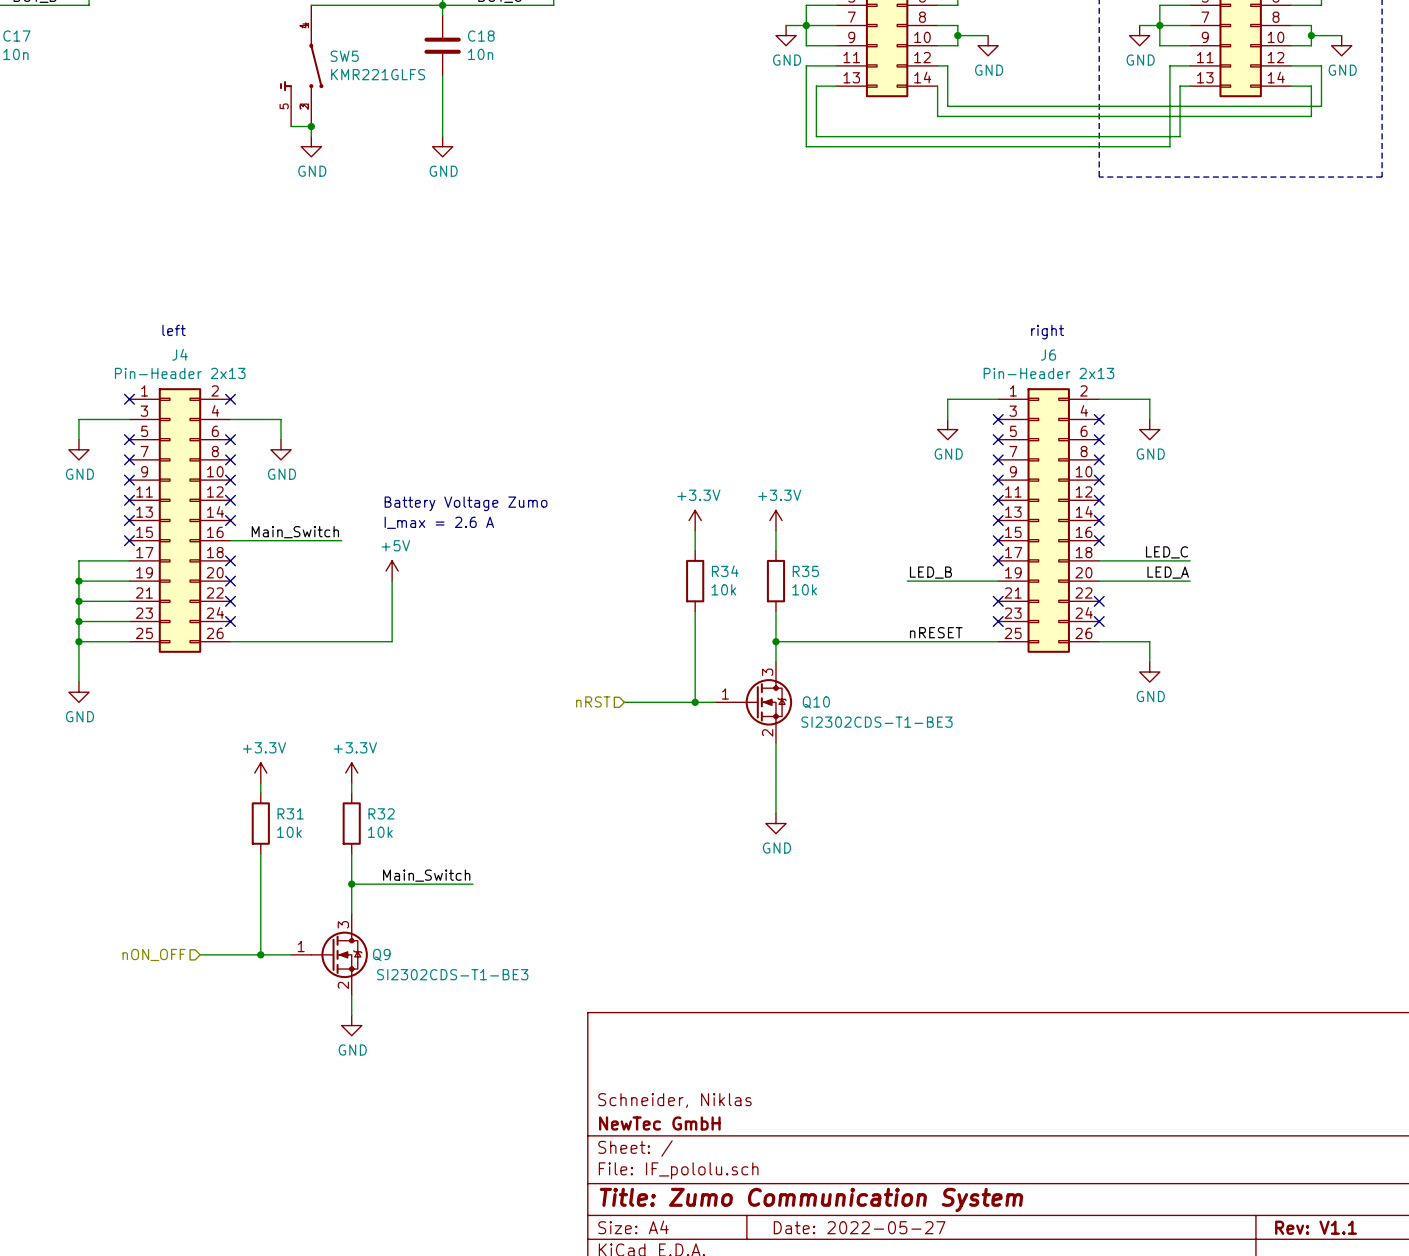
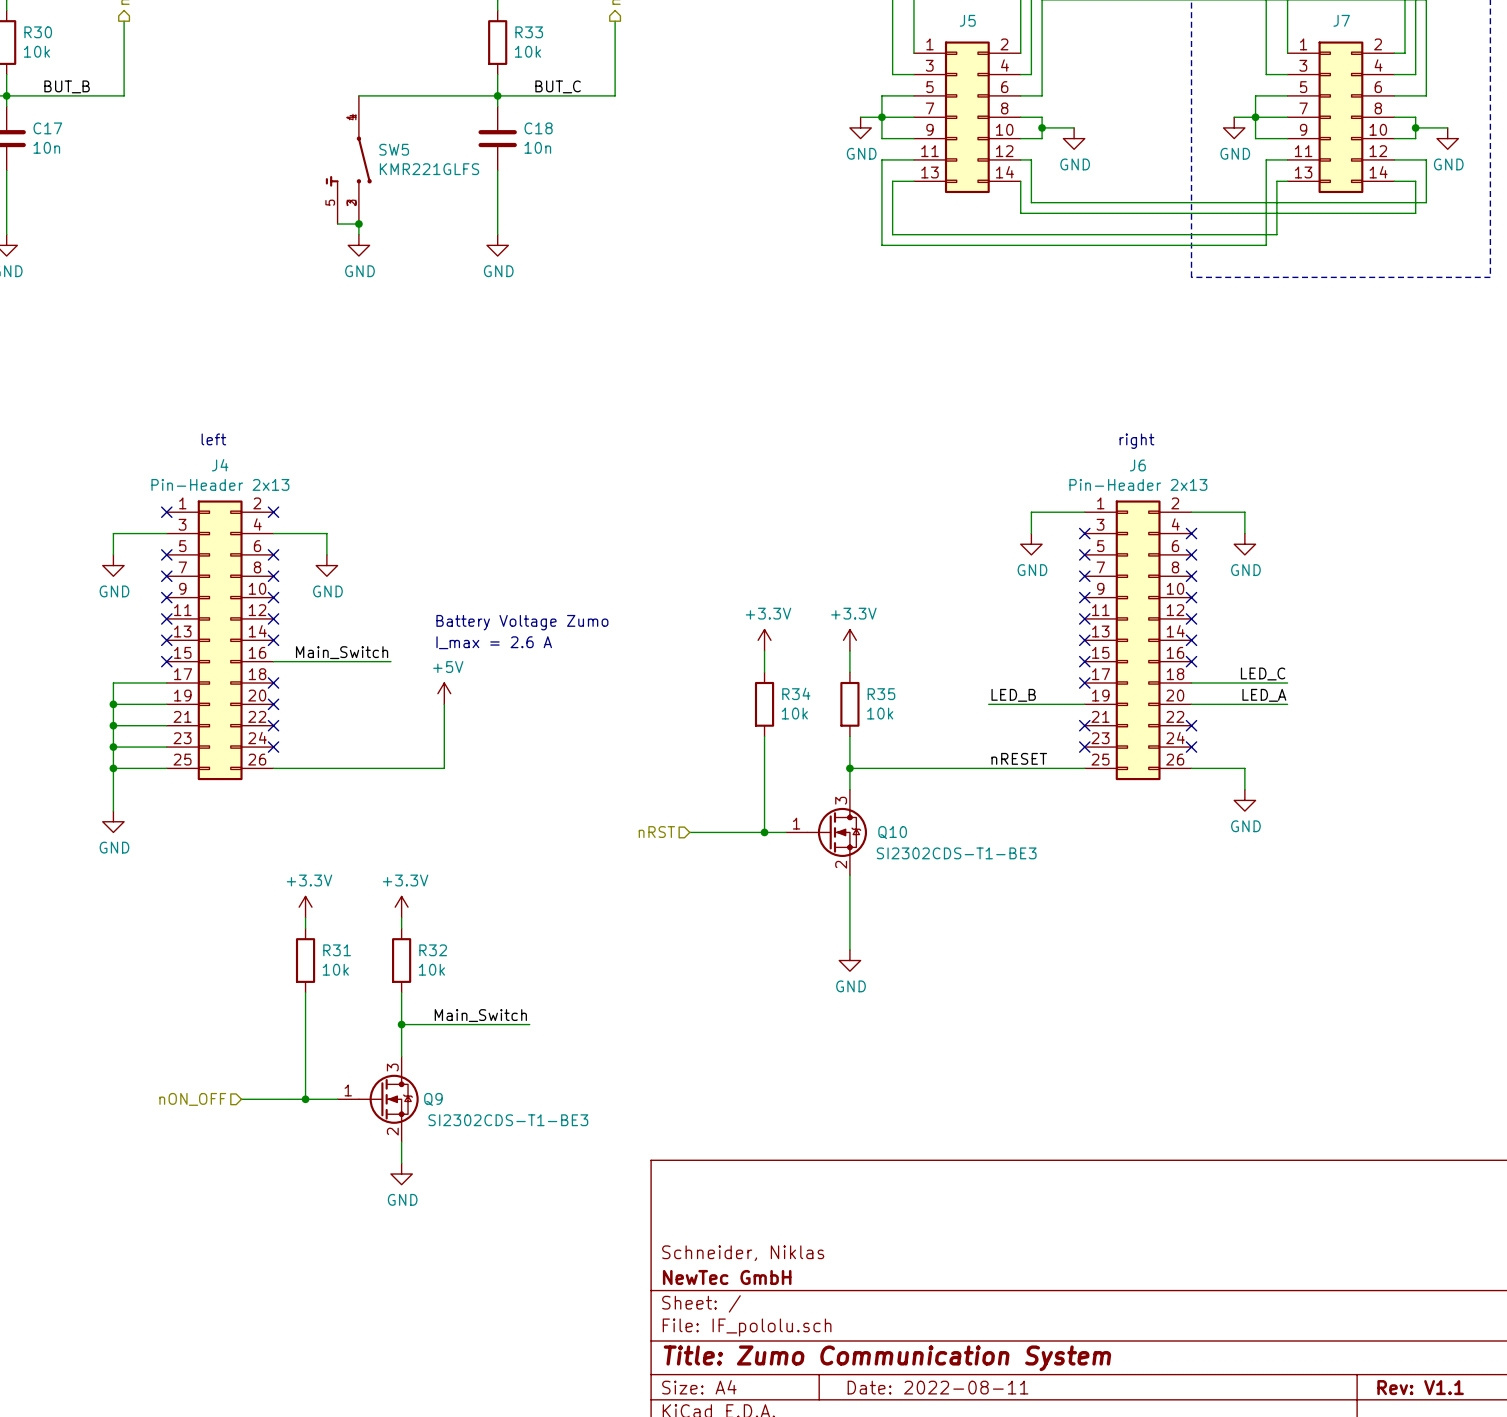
title block: Date: 2022-05-27 (859, 1227) -> Date: 2022-08-11 (938, 1387)

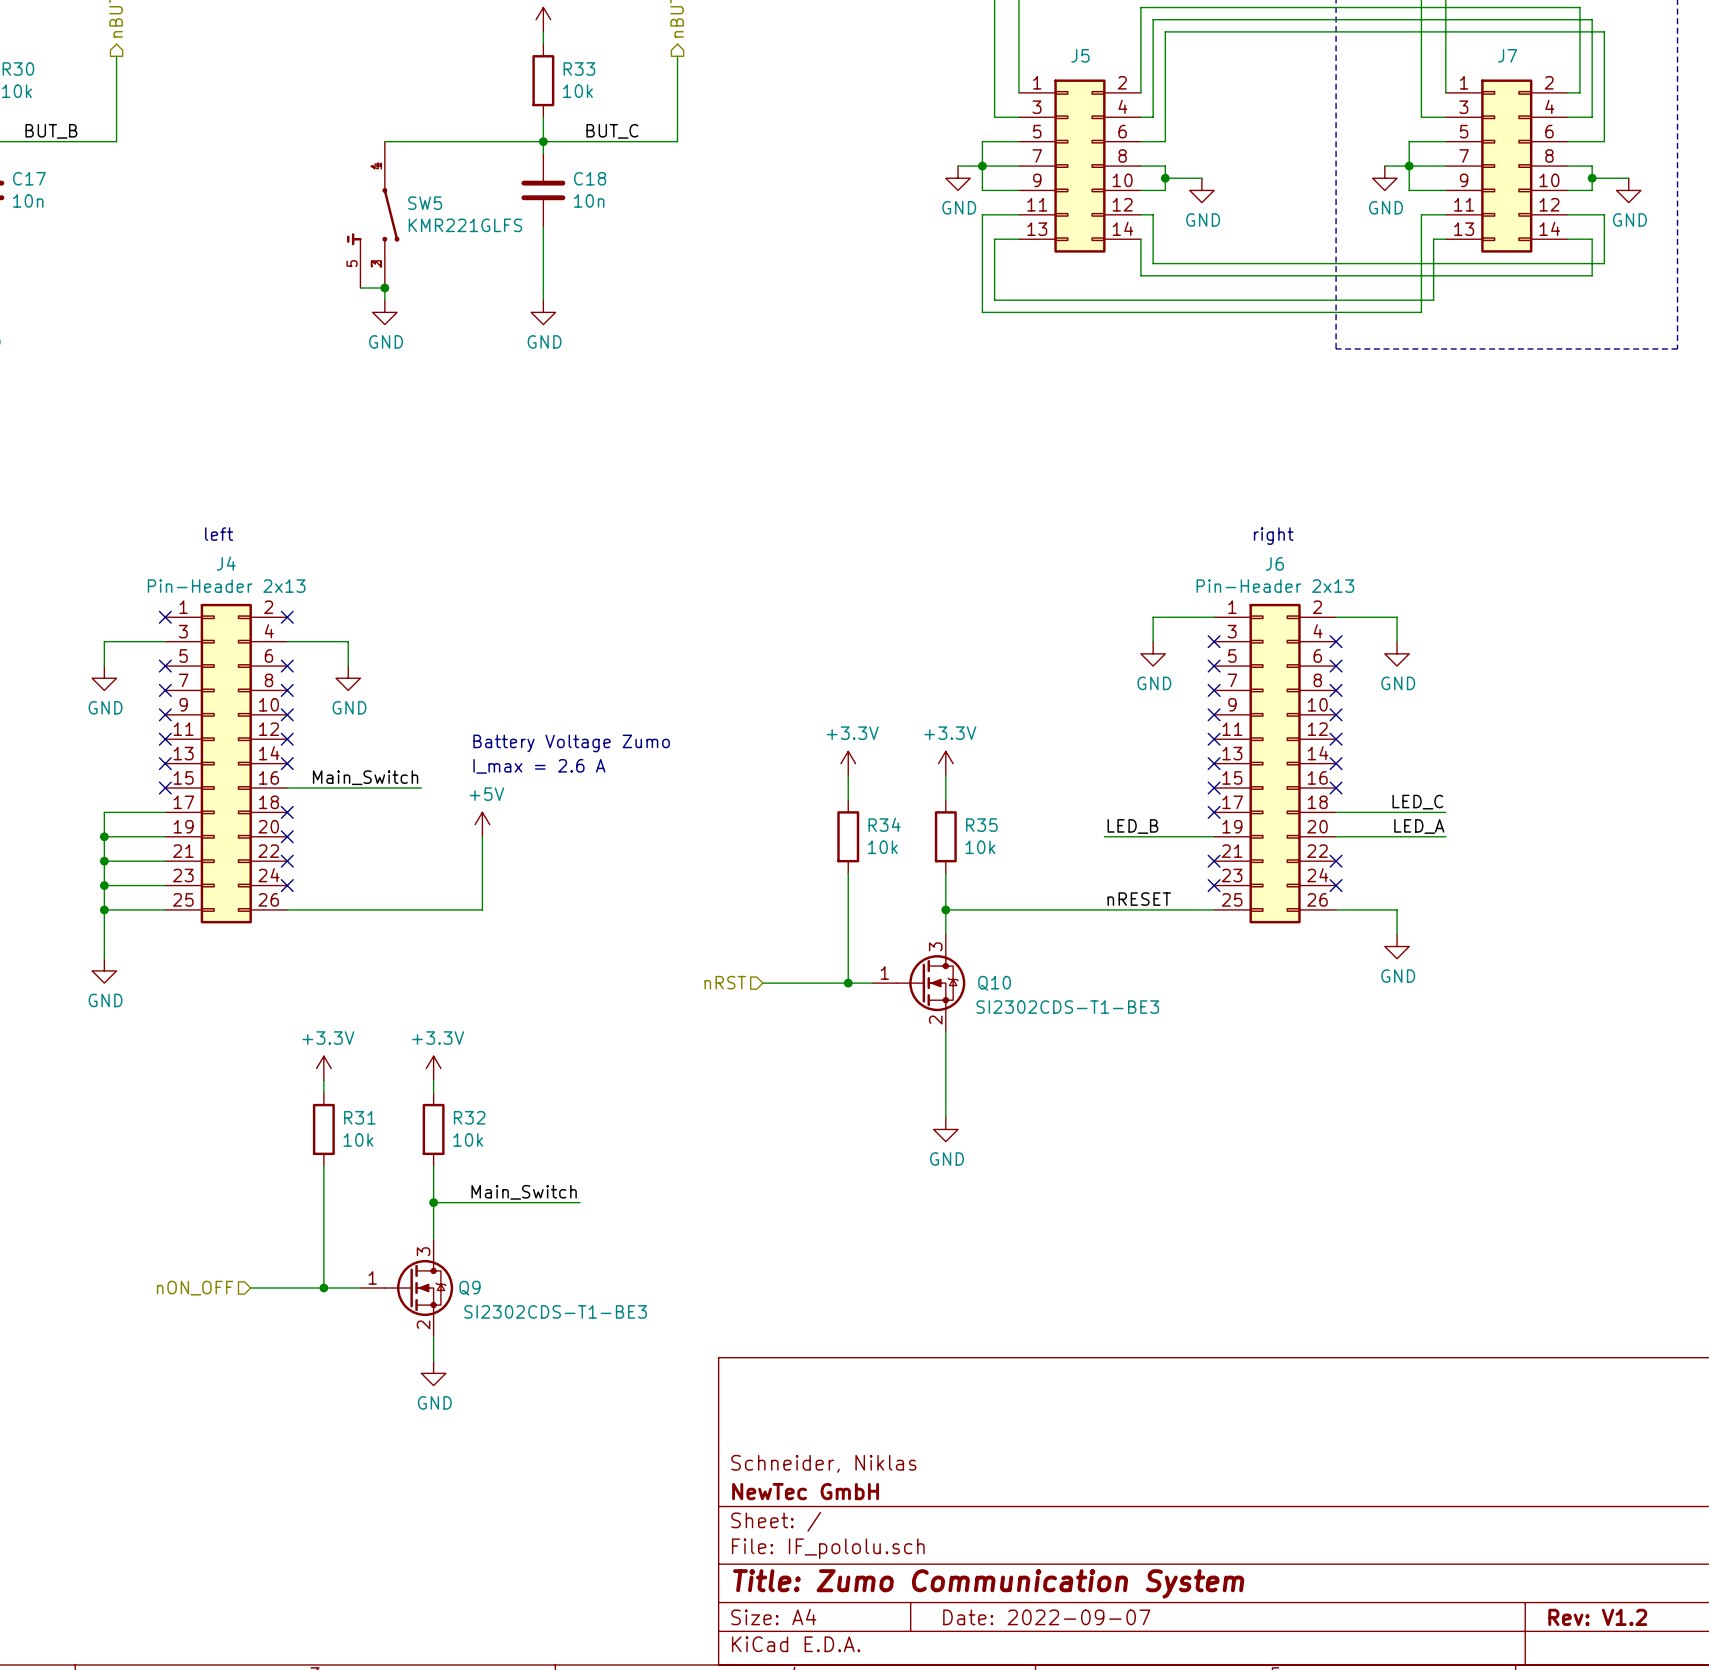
title block: Date: 2022-08-11 (938, 1387) -> Date: 2022-09-07 (1046, 1617)
title block: Rev: V1.1 (1420, 1387) -> Rev: V1.2 (1597, 1617)

